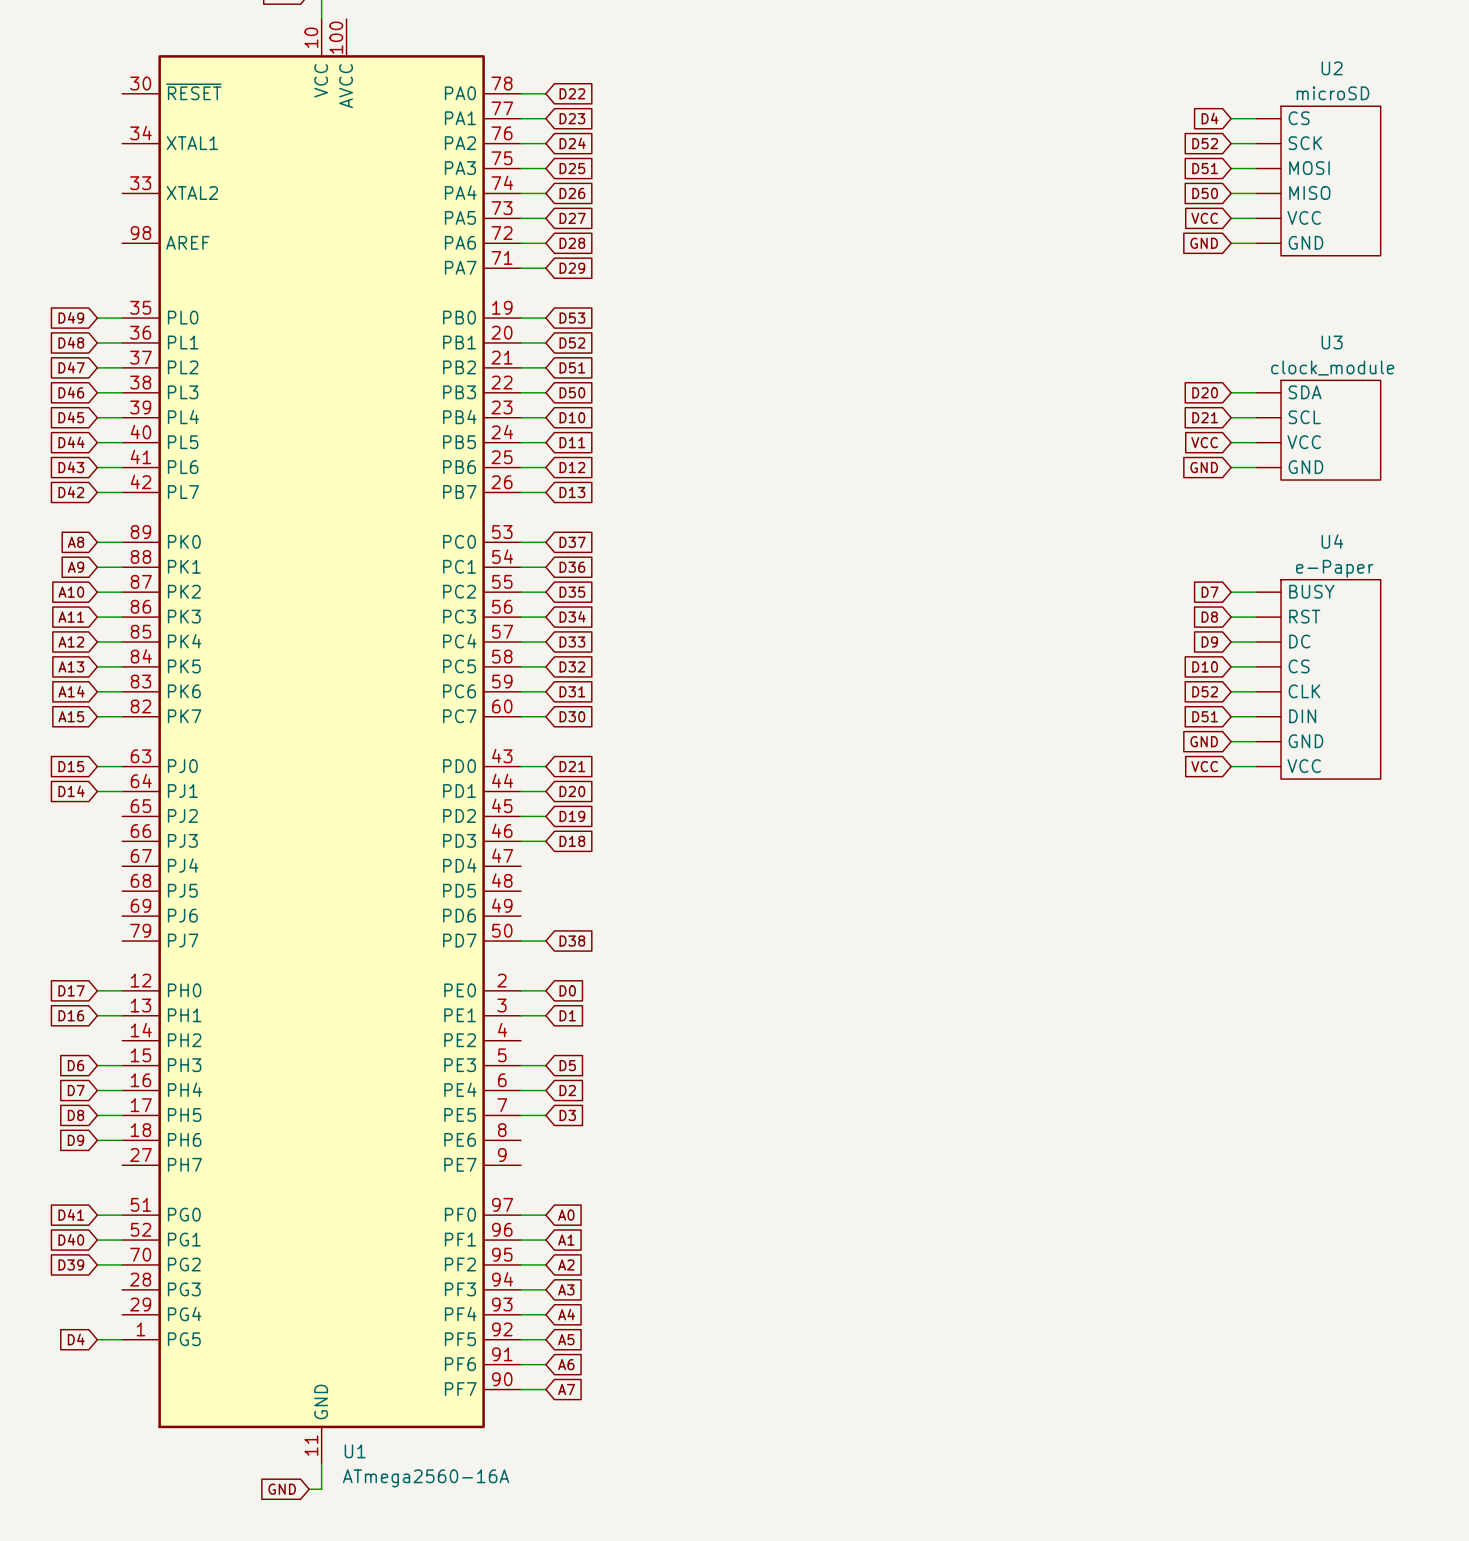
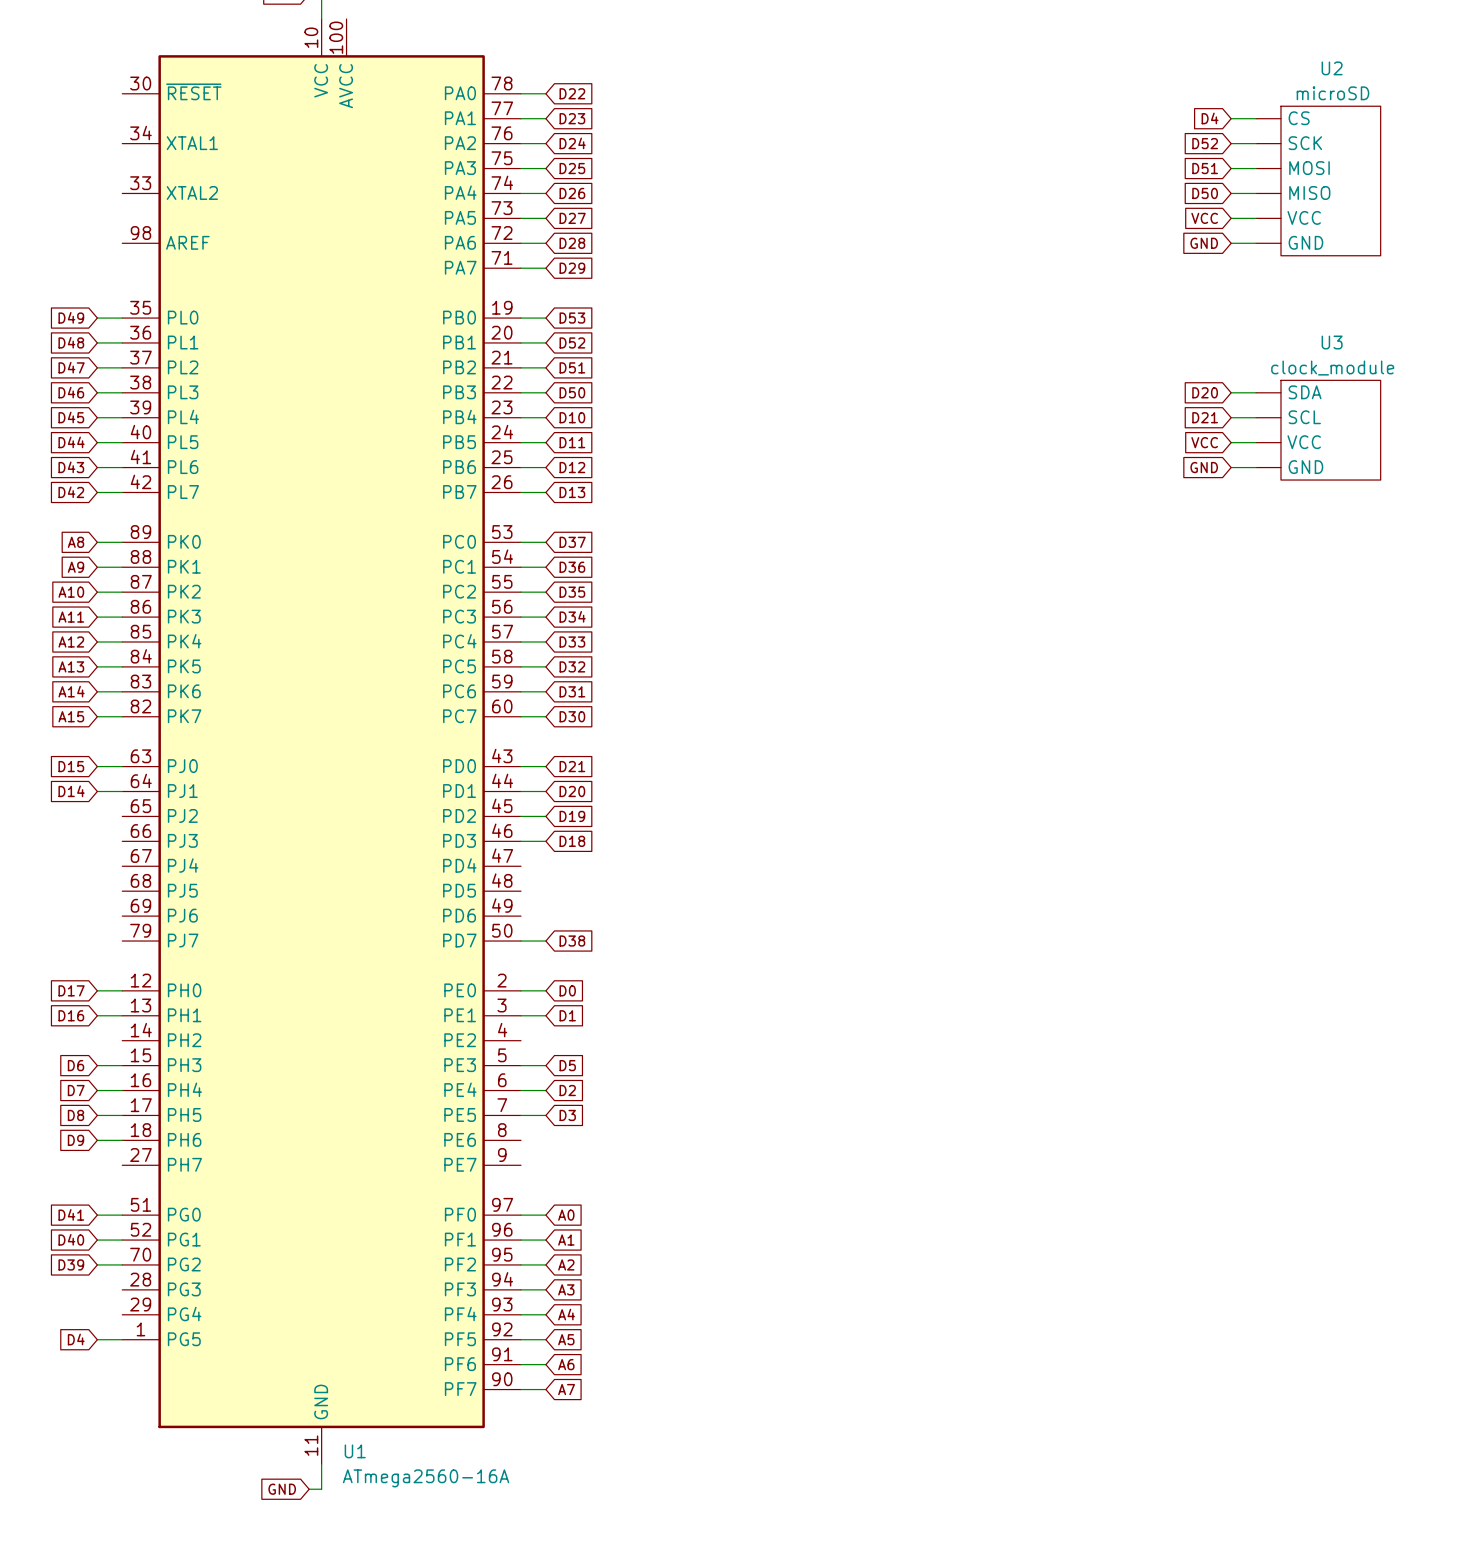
global label: D7 (1210, 592) -> none
wire: (1231, 592) (1256, 592) -> none
global label: D8 (1209, 617) -> none
wire: (1231, 617) (1256, 617) -> none
global label: D9 (1209, 641) -> none
wire: (1231, 641) (1256, 641) -> none
global label: D10 (1205, 666) -> none
wire: (1231, 666) (1256, 666) -> none
U4: e-Paper (1318, 679) -> none
global label: D52 (1205, 691) -> none
wire: (1231, 691) (1256, 691) -> none
global label: D51 (1205, 716) -> none
wire: (1231, 716) (1256, 716) -> none
global label: GND (1204, 741) -> none
wire: (1231, 741) (1256, 741) -> none
global label: VCC (1204, 766) -> none
wire: (1231, 766) (1256, 766) -> none

